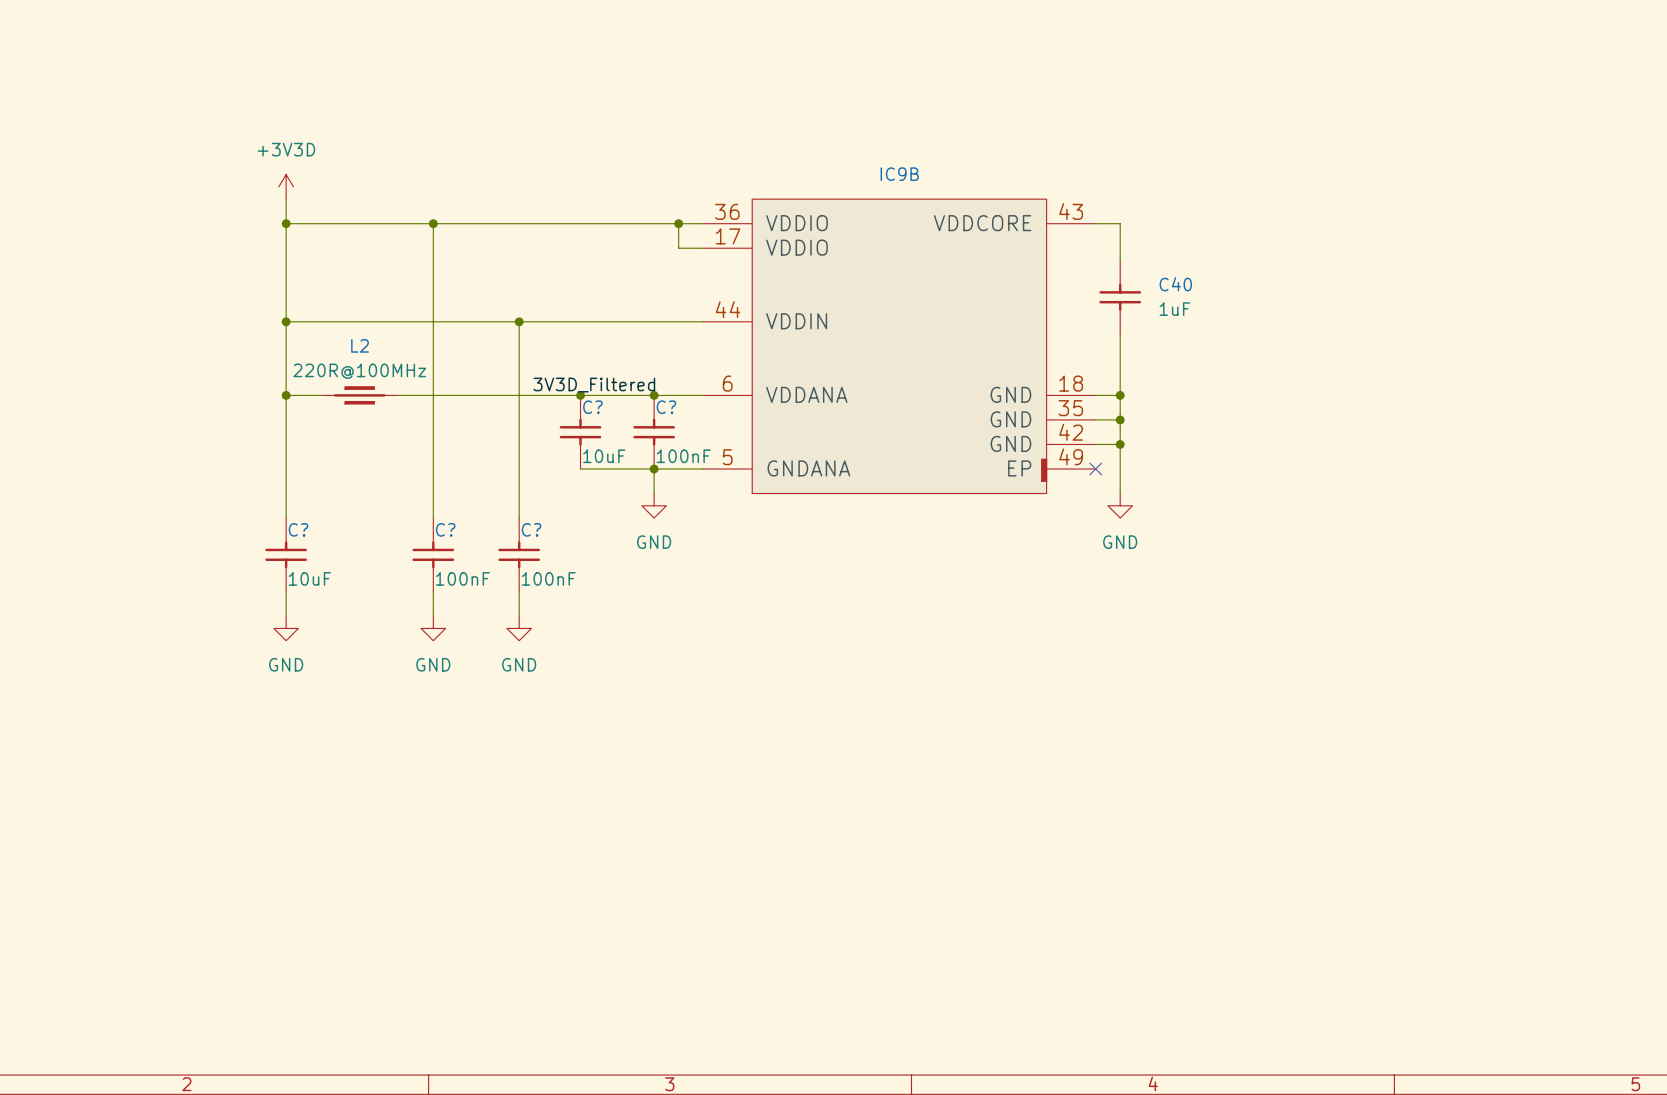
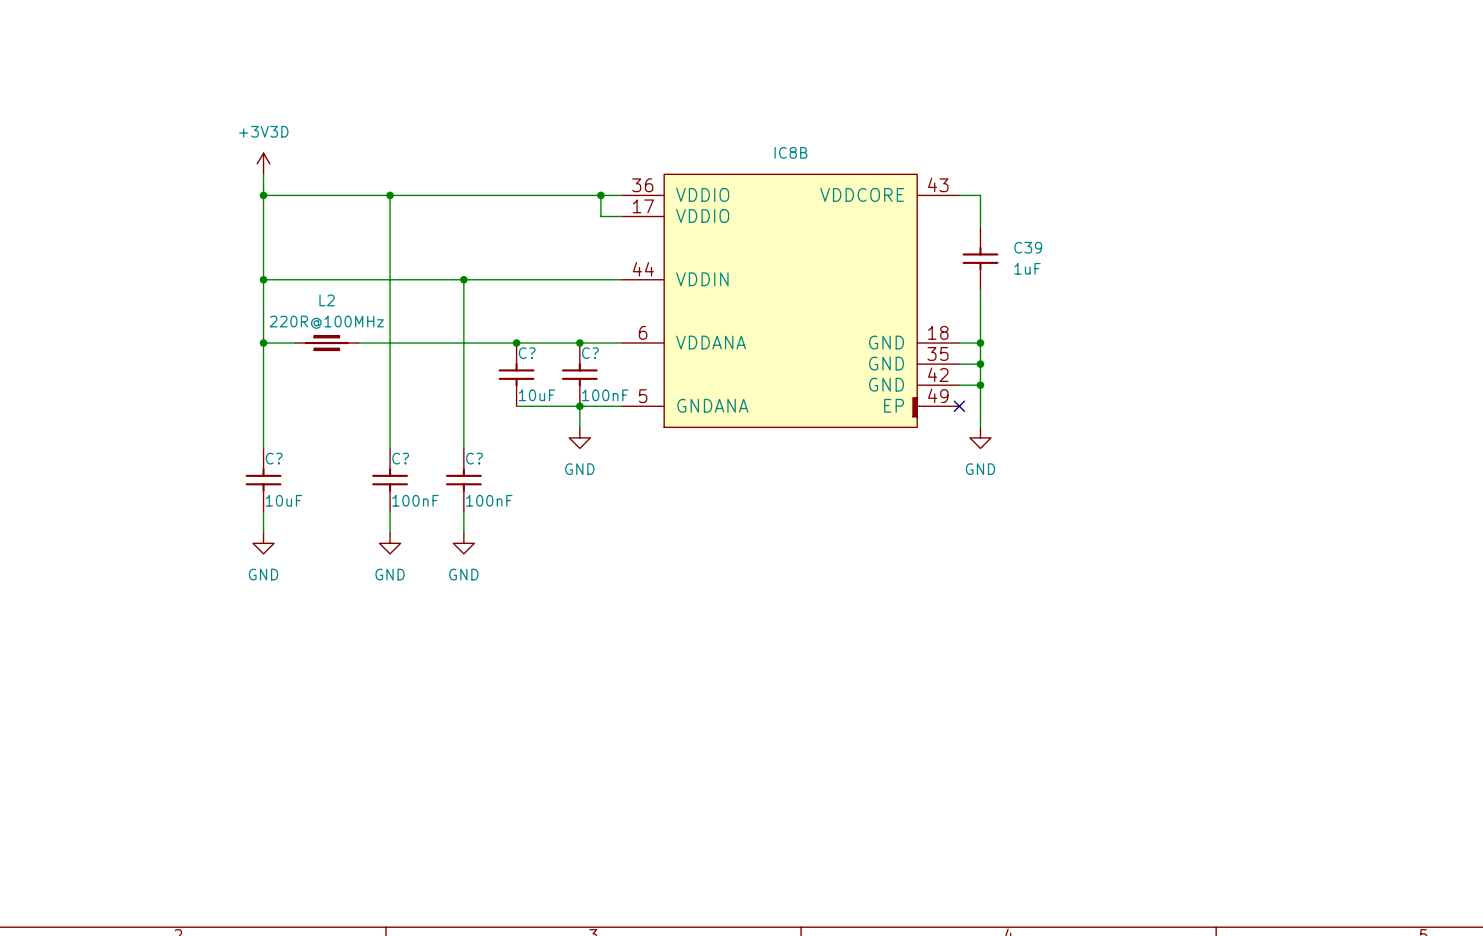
IC9B name: IC9B (899, 174) -> IC8B (790, 152)
C40 name: C40 (1175, 284) -> C39 (1028, 247)
label: 3V3D_Filtered (594, 385) -> none

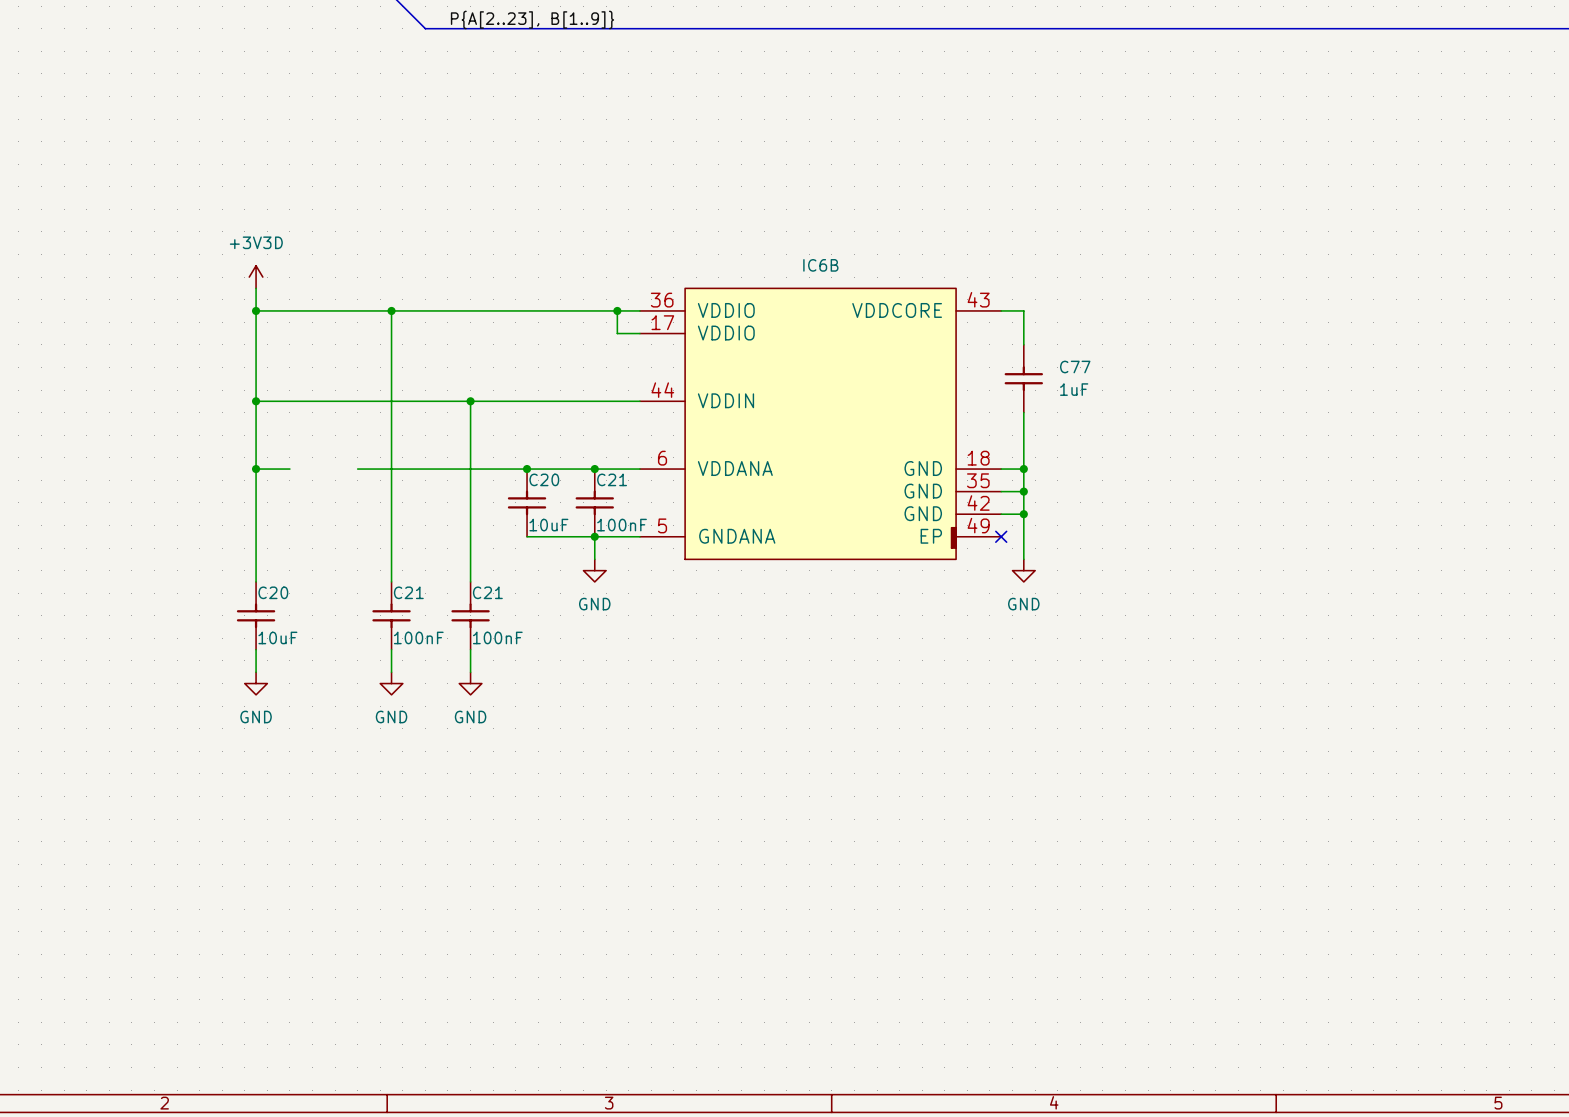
IC8B name: IC8B (790, 152) -> IC6B (820, 265)
C39 name: C39 (1028, 247) -> C77 (1075, 366)
L2: (326, 343) -> none
C? name: C? (527, 353) -> C20 (544, 479)
C? name: C? (590, 353) -> C21 (612, 479)
C? name: C? (274, 458) -> C20 (273, 592)
C? name: C? (400, 458) -> C21 (408, 592)
C? name: C? (474, 458) -> C21 (487, 592)

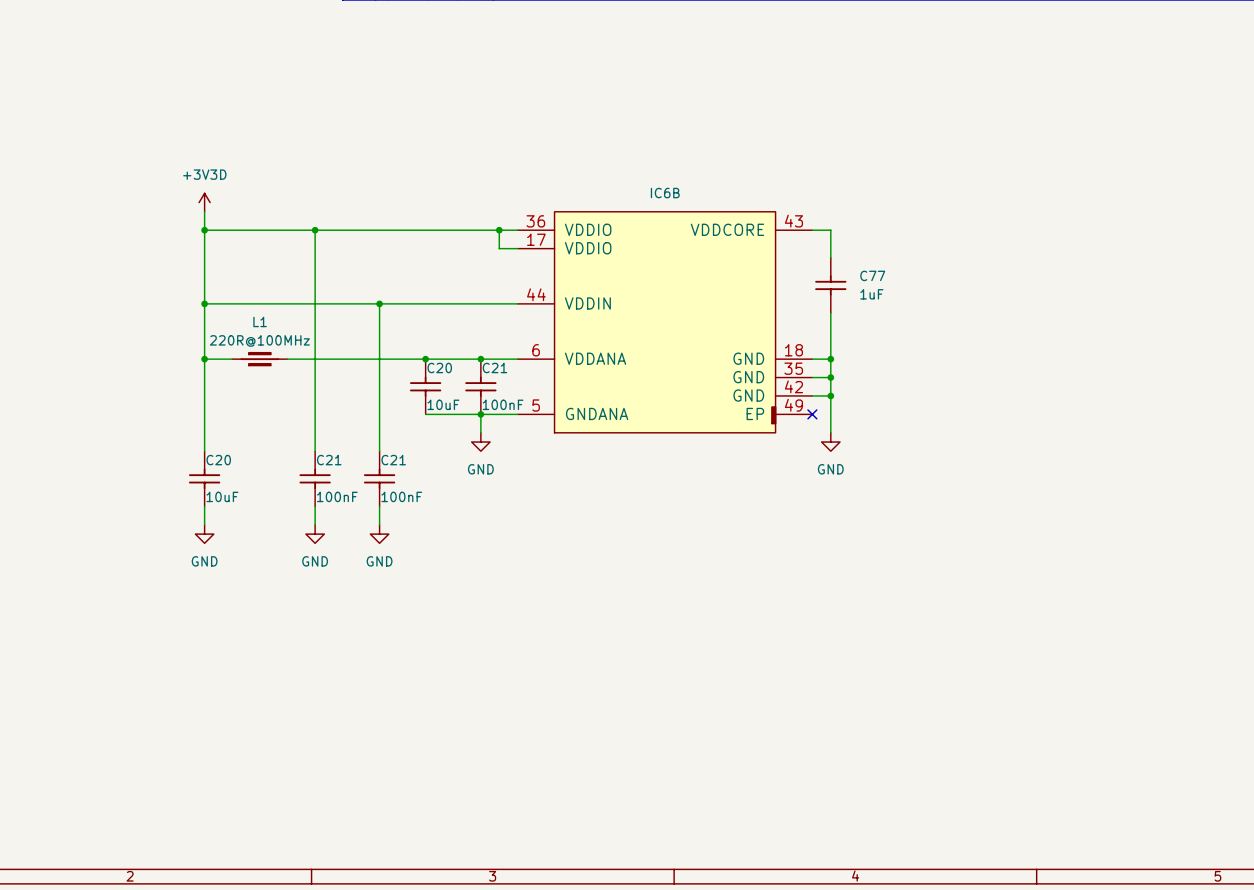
L1: none -> (259, 359)

